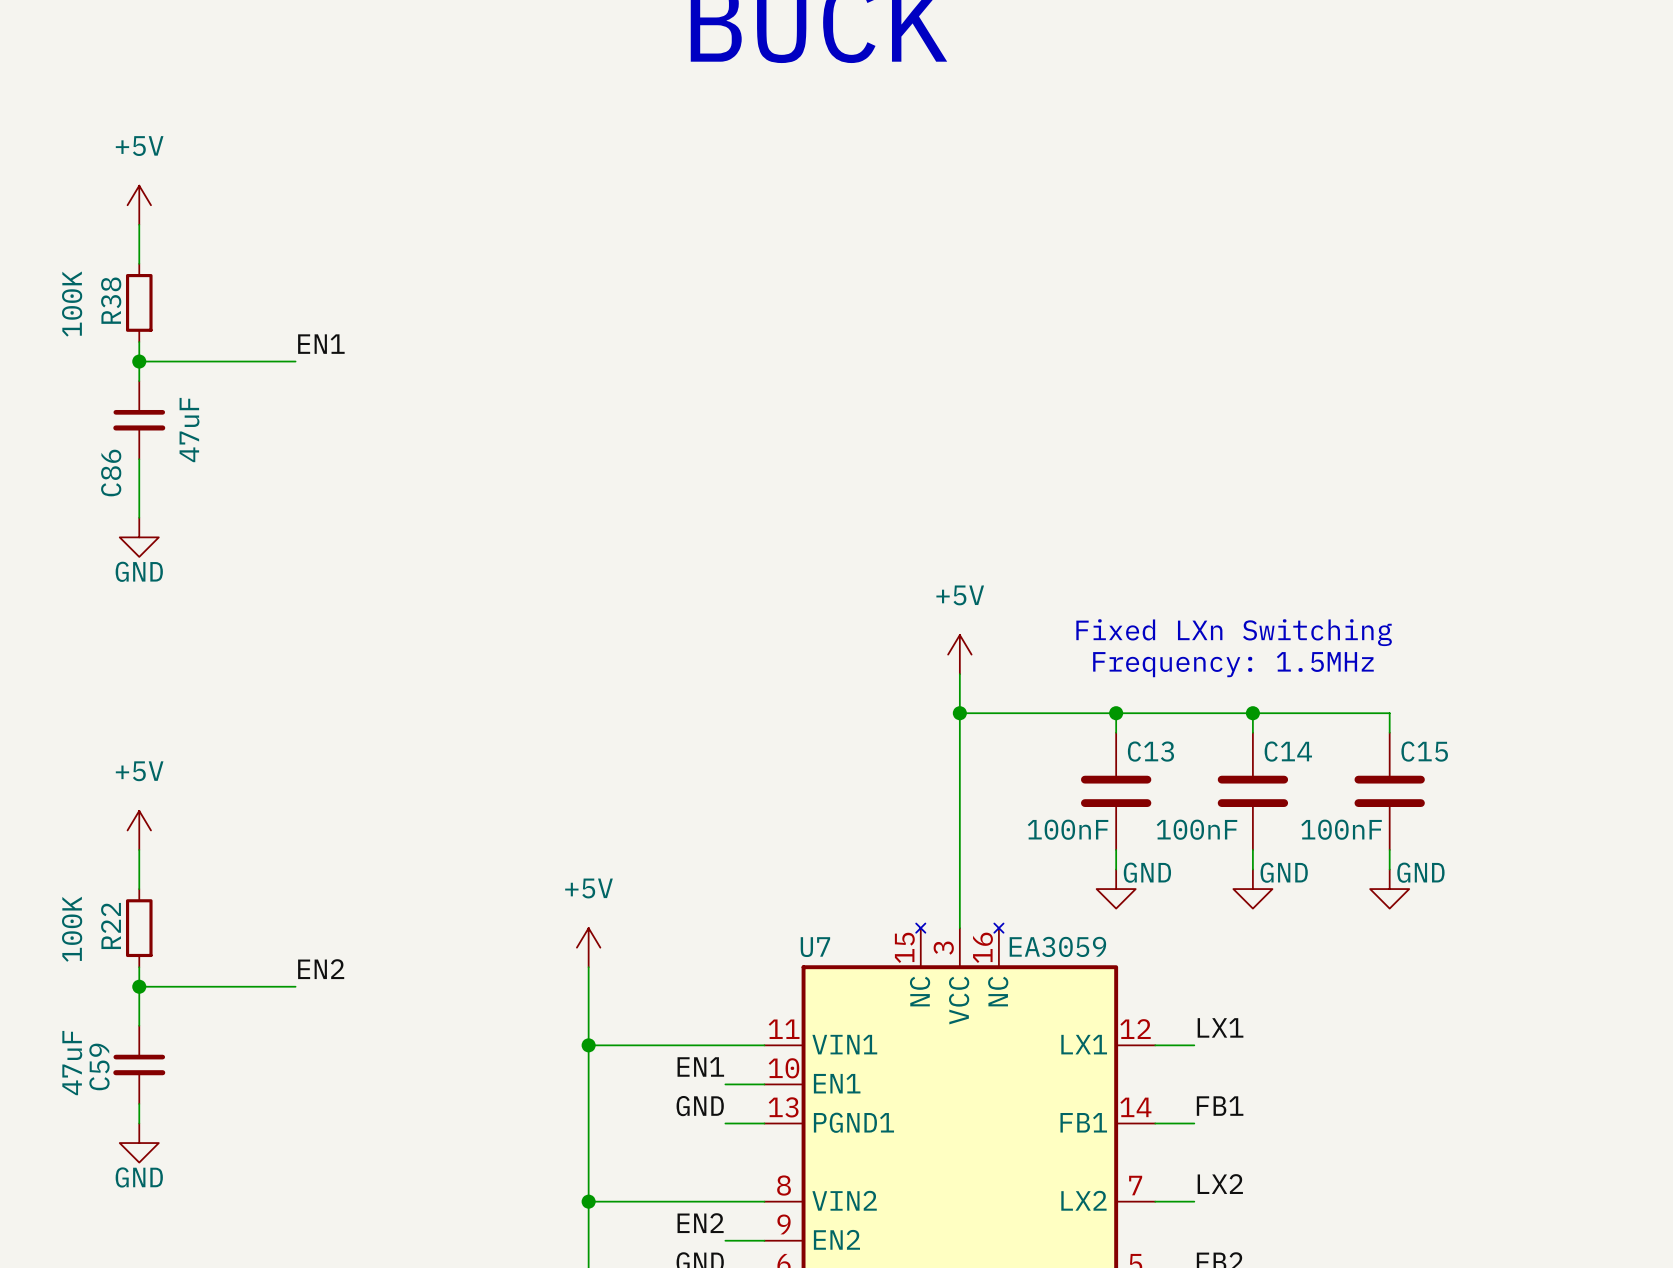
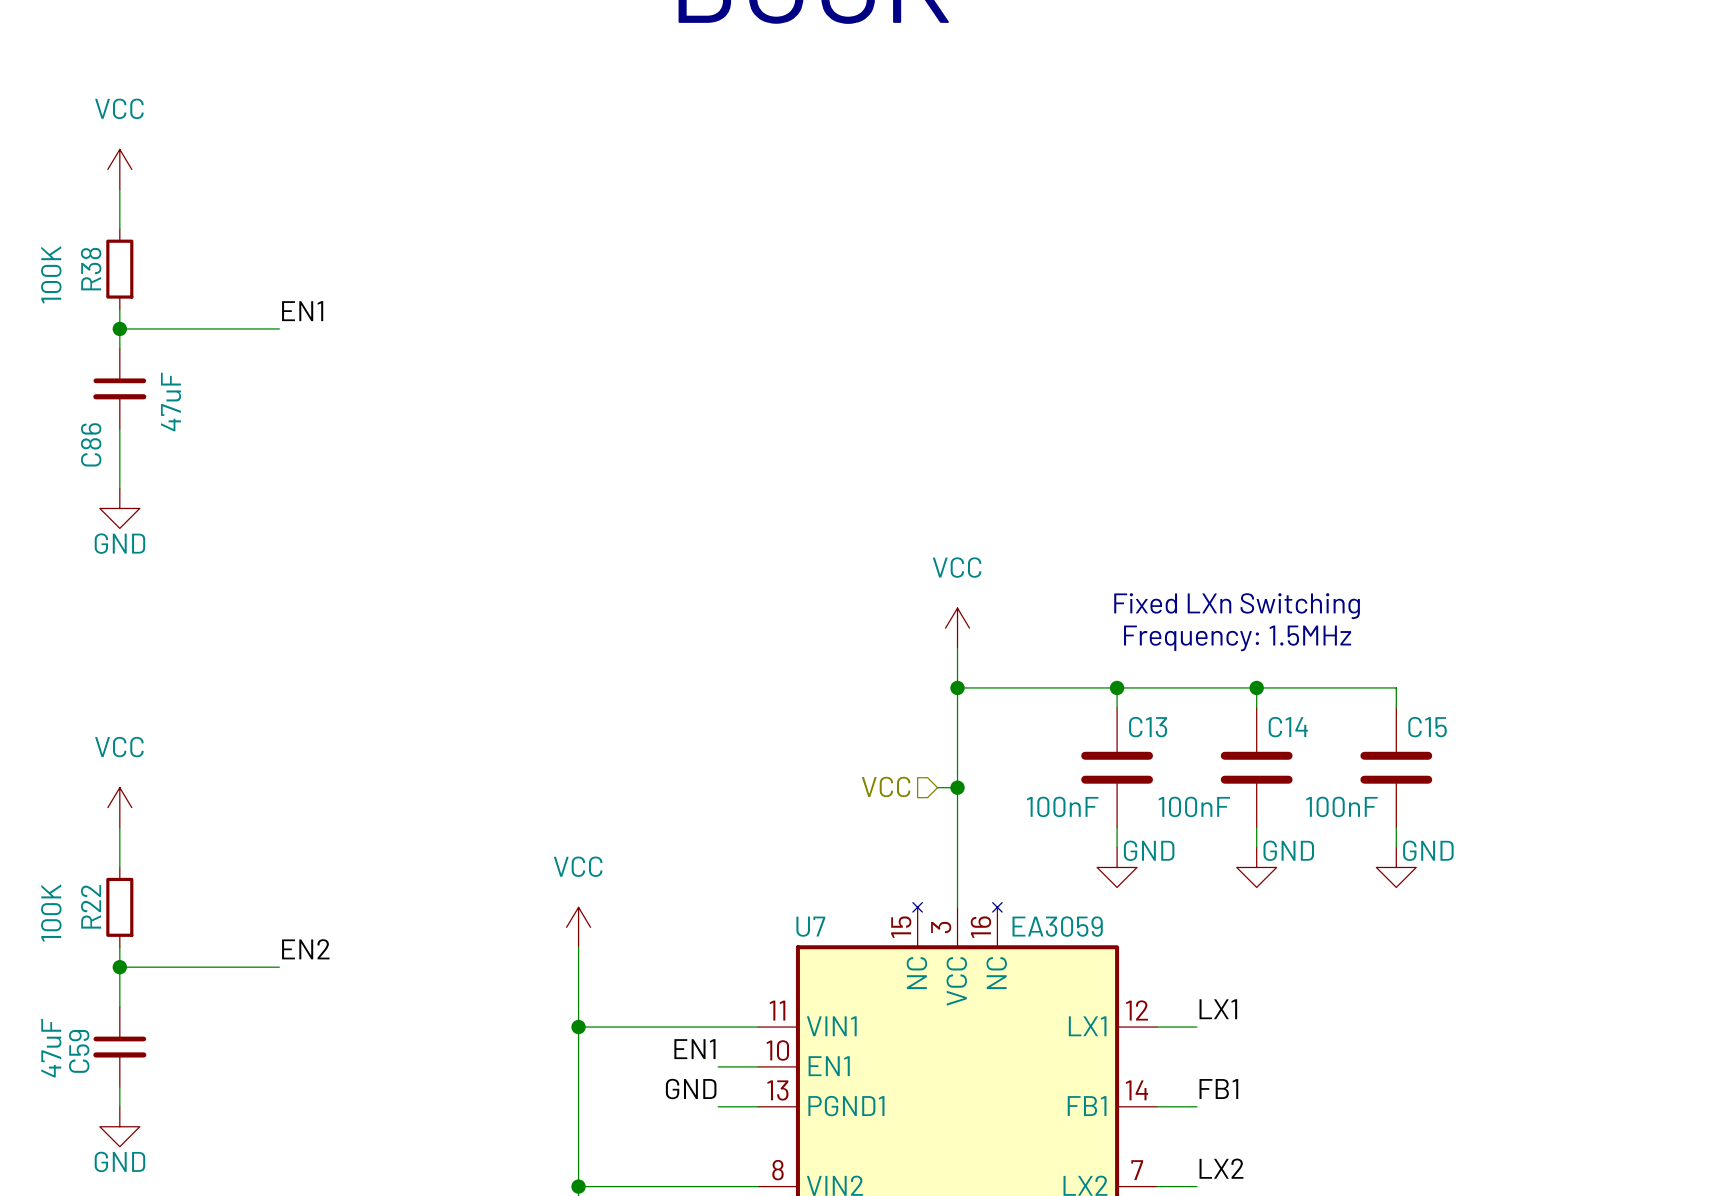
power symbol: +5V (139, 205) -> VCC (119, 169)
power symbol: +5V (959, 654) -> VCC (957, 628)
hierarchical label: none -> VCC (886, 786)
wire: none -> (937, 787) (957, 787)
junction: none -> (957, 787)
power symbol: +5V (139, 830) -> VCC (119, 807)
power symbol: +5V (588, 947) -> VCC (578, 927)

